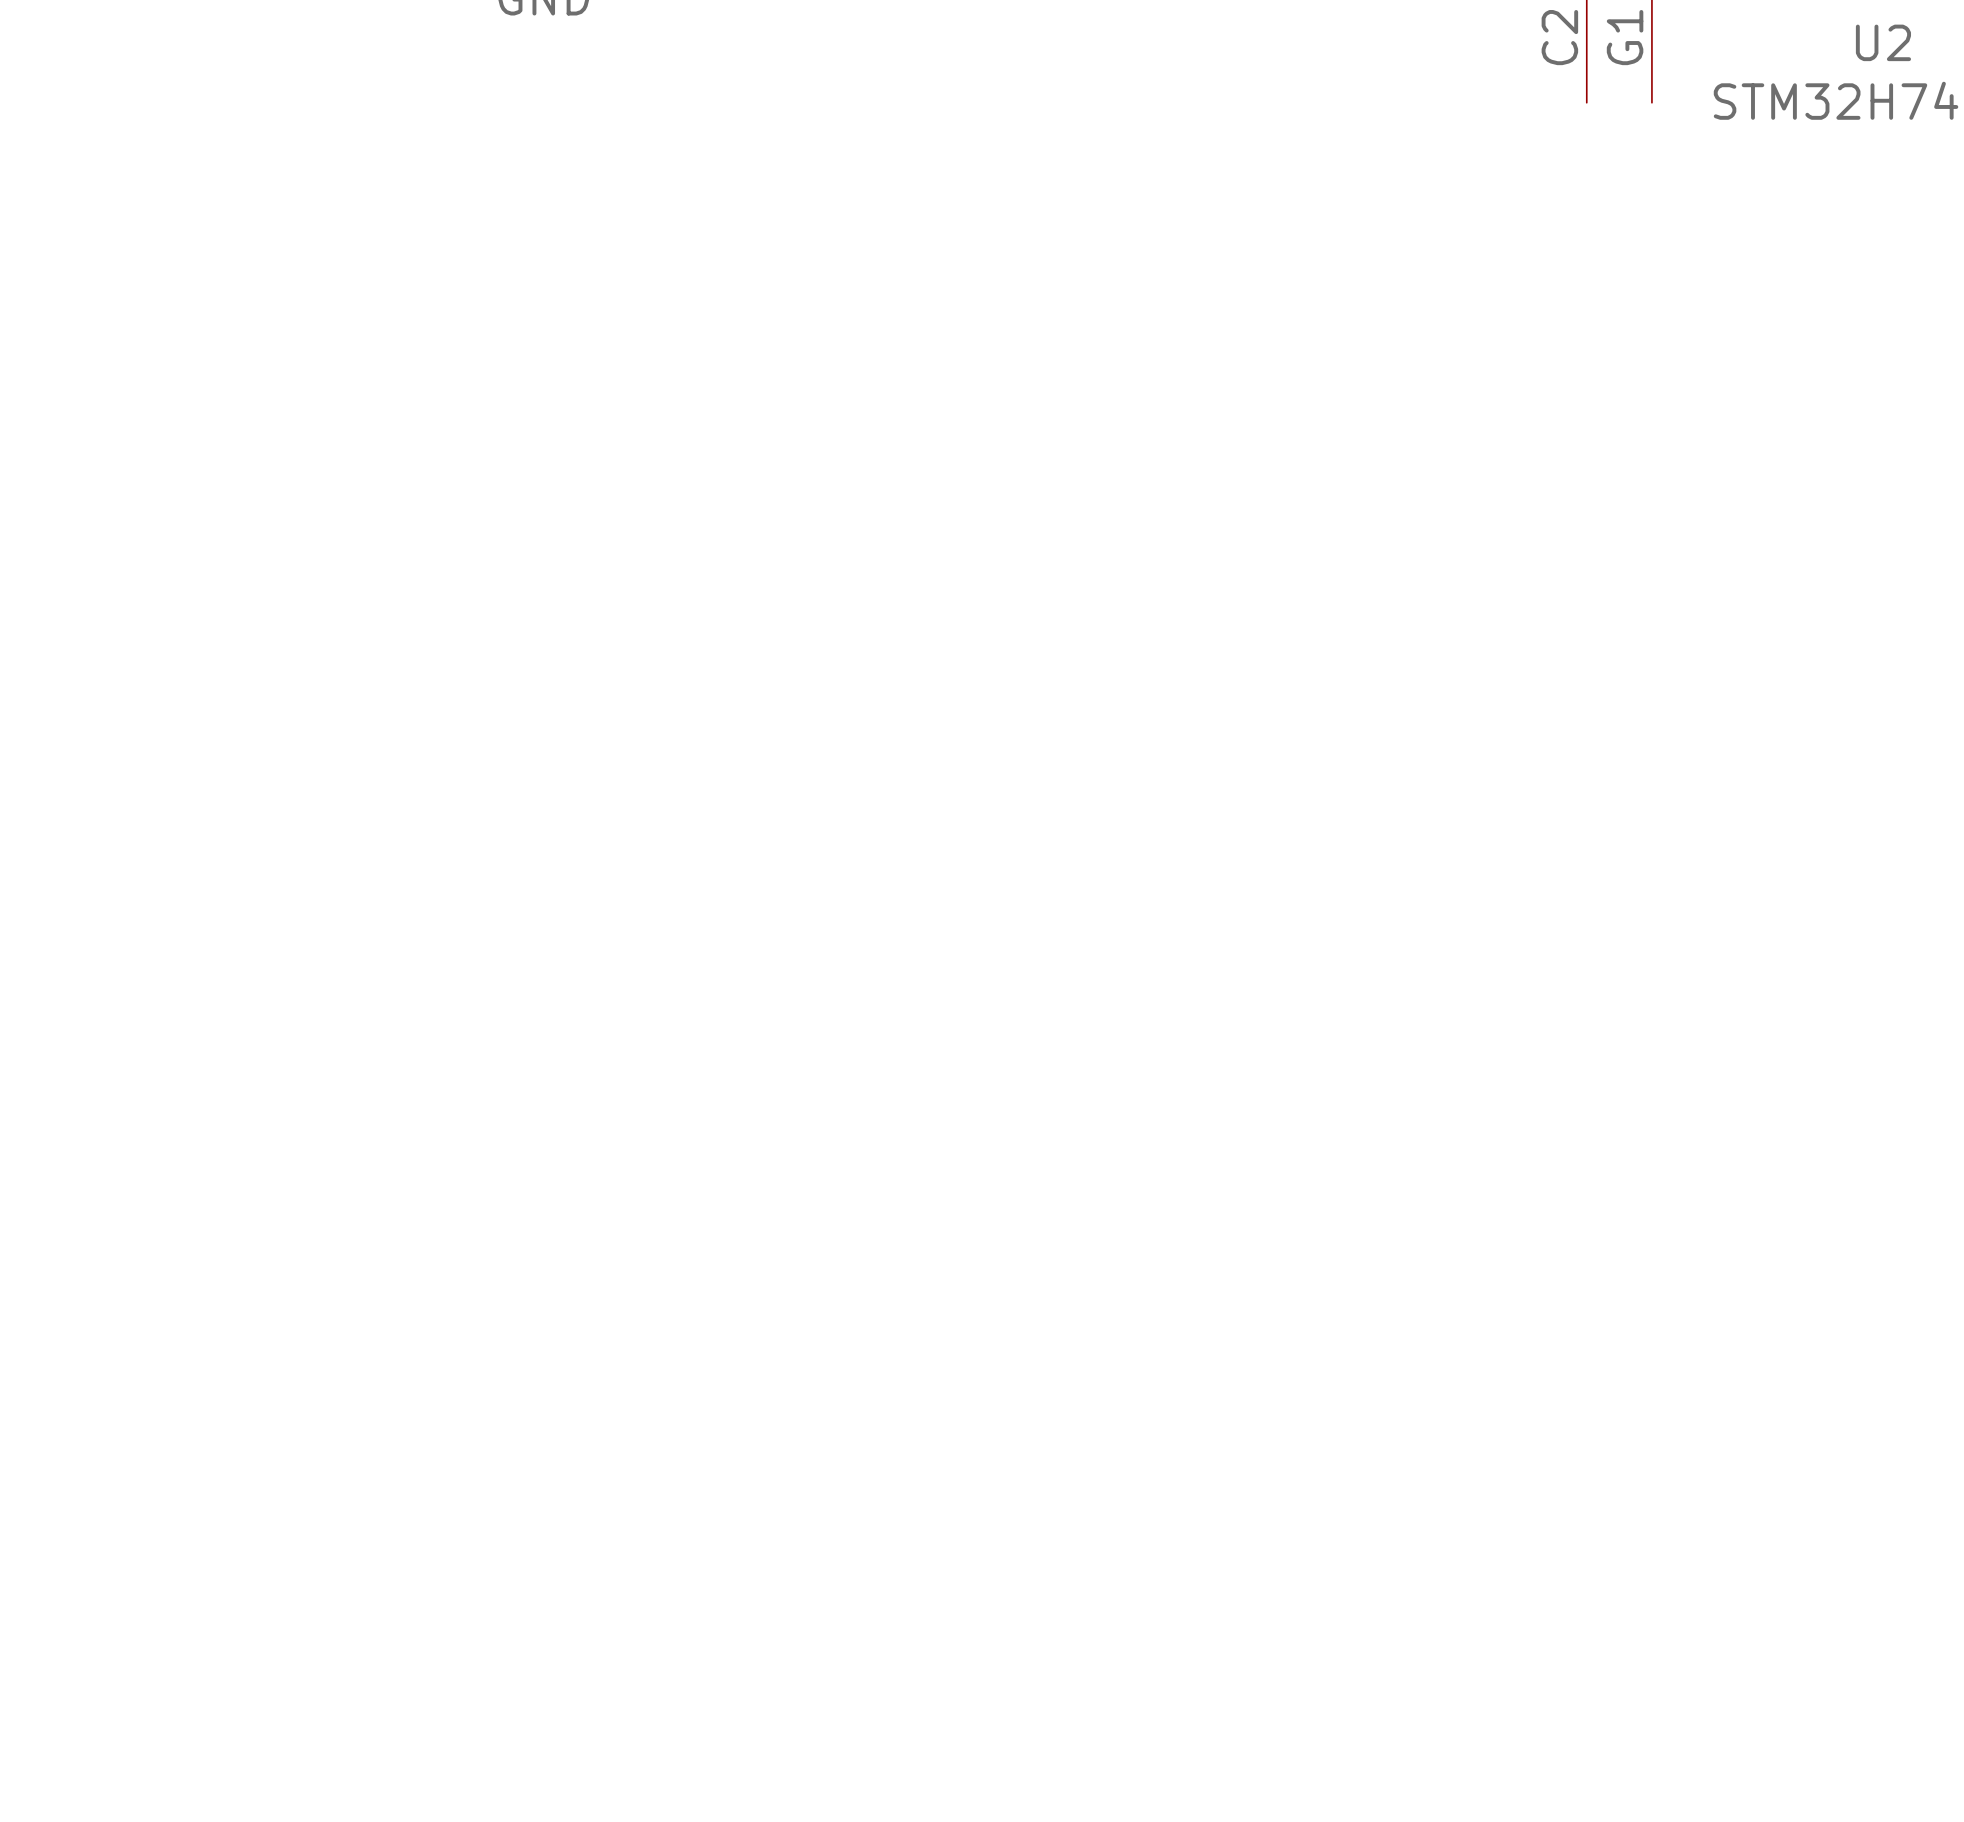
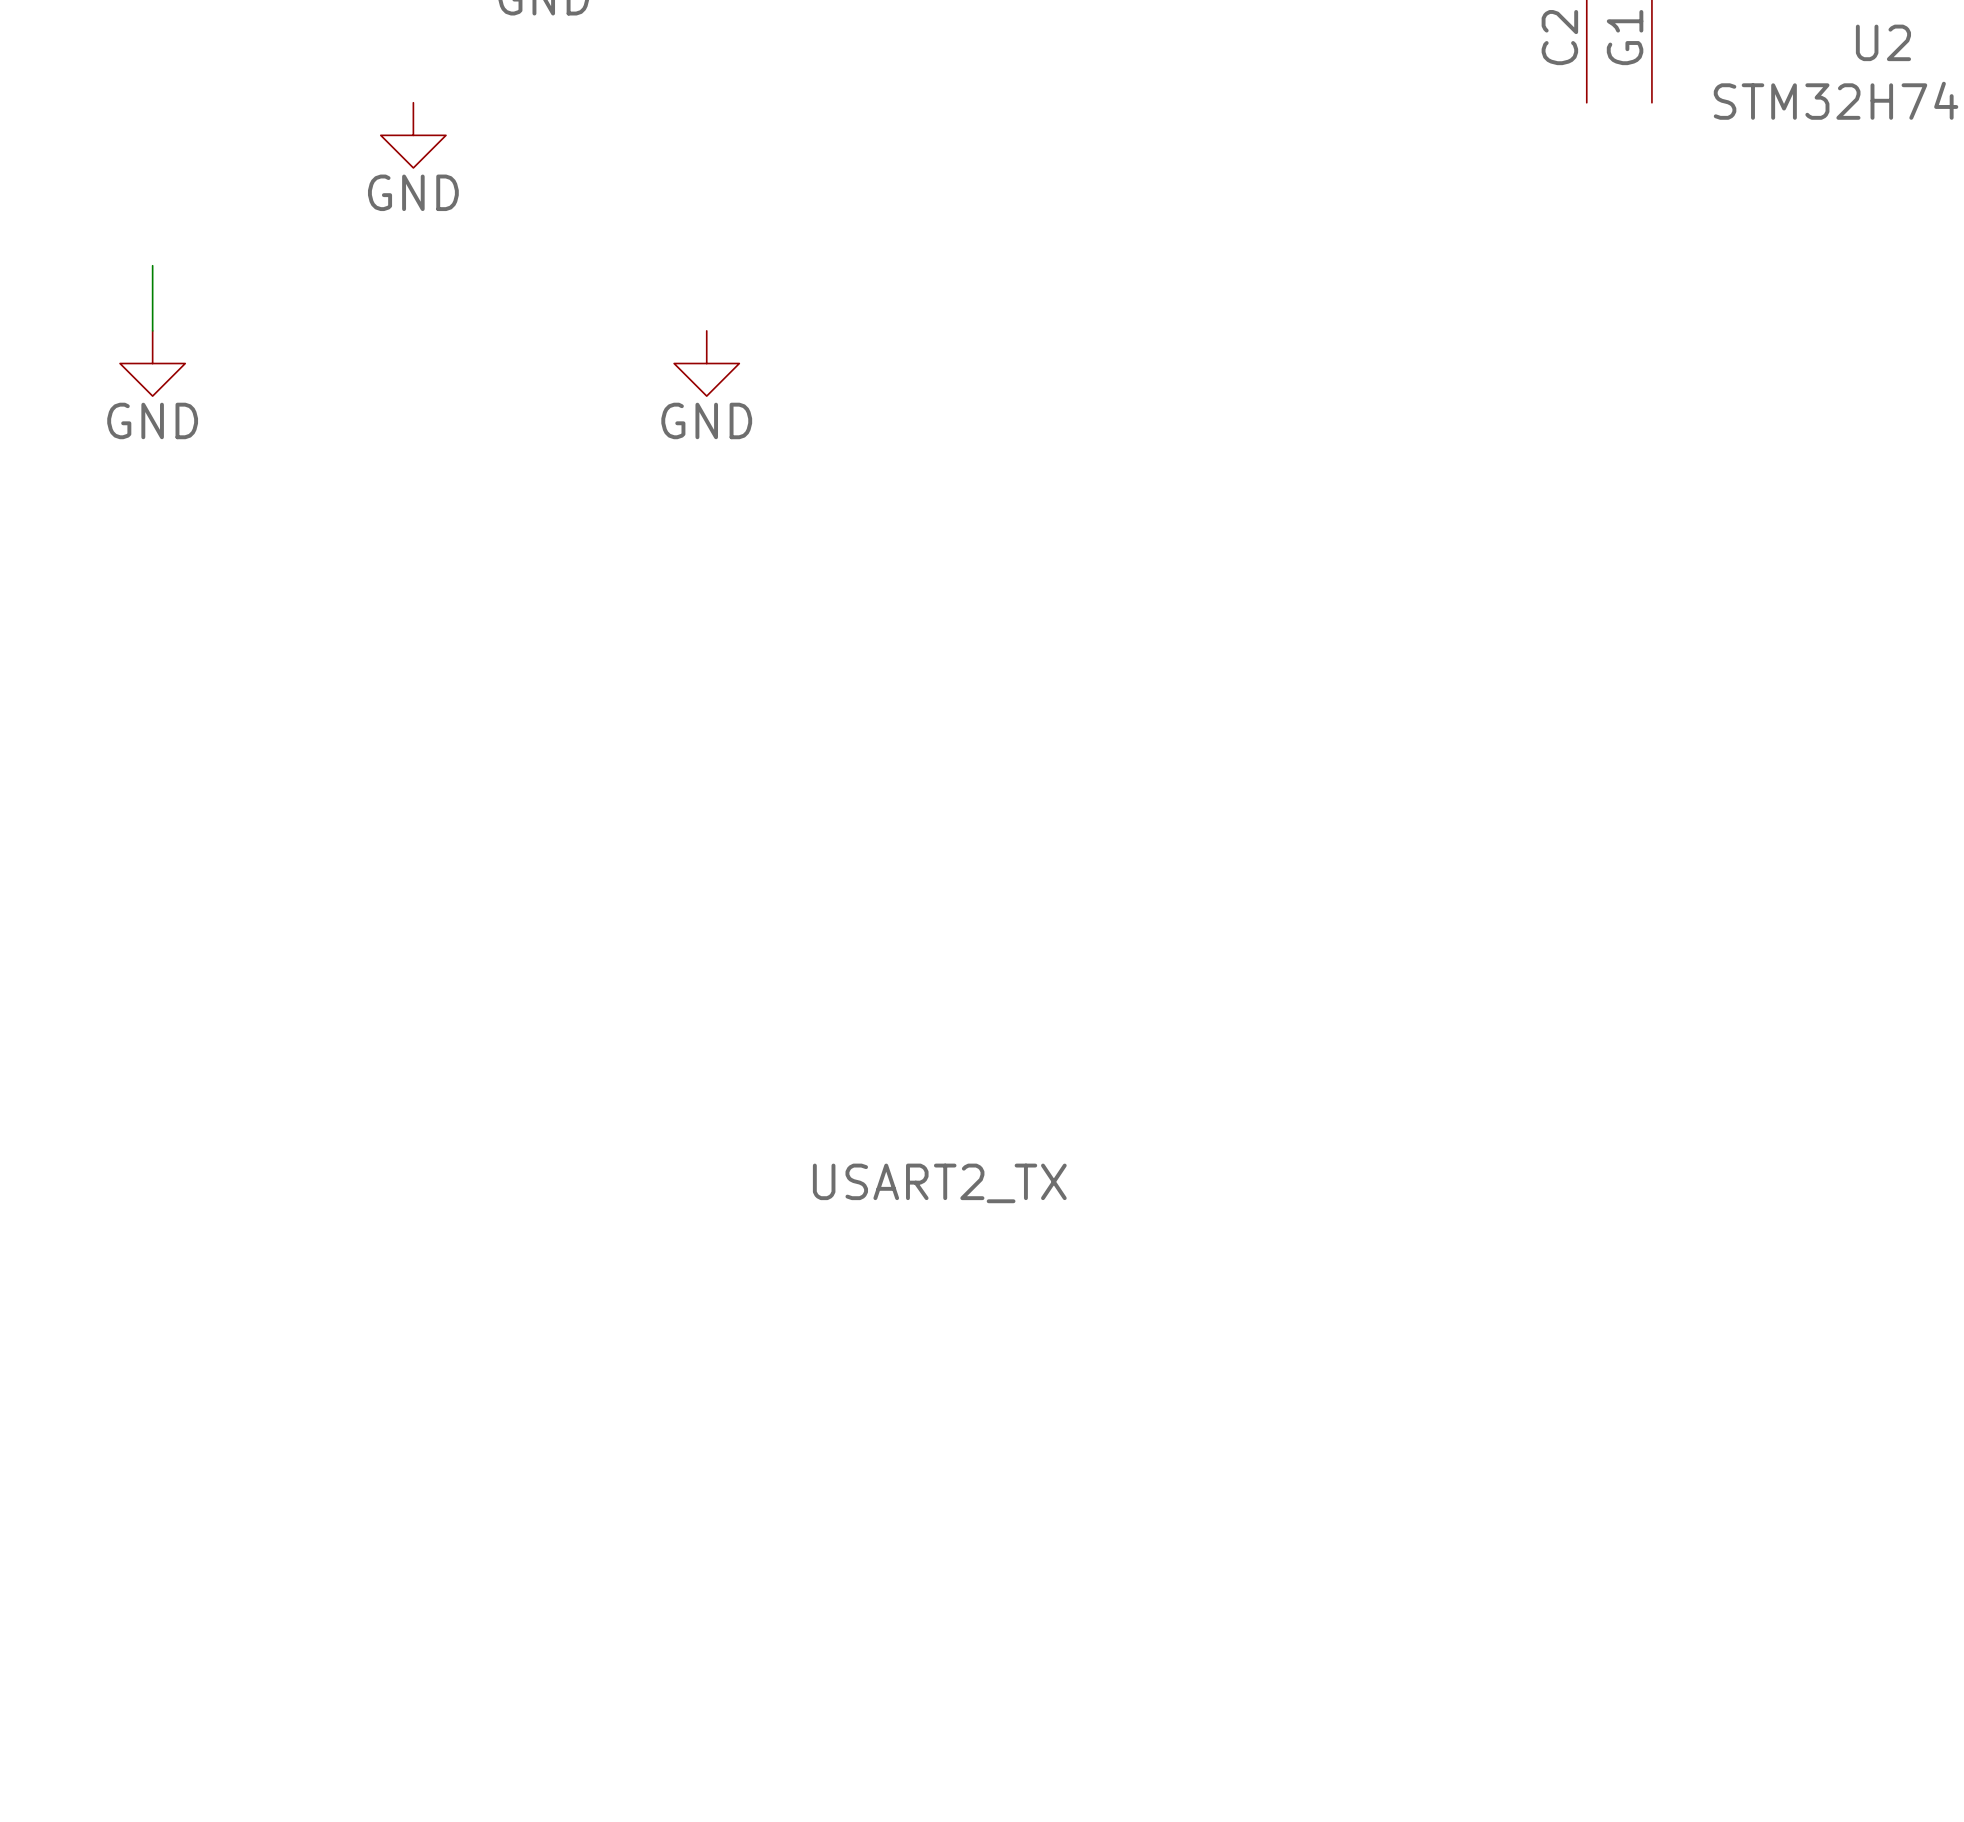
power symbol: none -> GND (413, 135)
wire: none -> (152, 265) (152, 330)
power symbol: none -> GND (152, 363)
power symbol: none -> GND (706, 363)
label: none -> USART2_TX (939, 1183)

